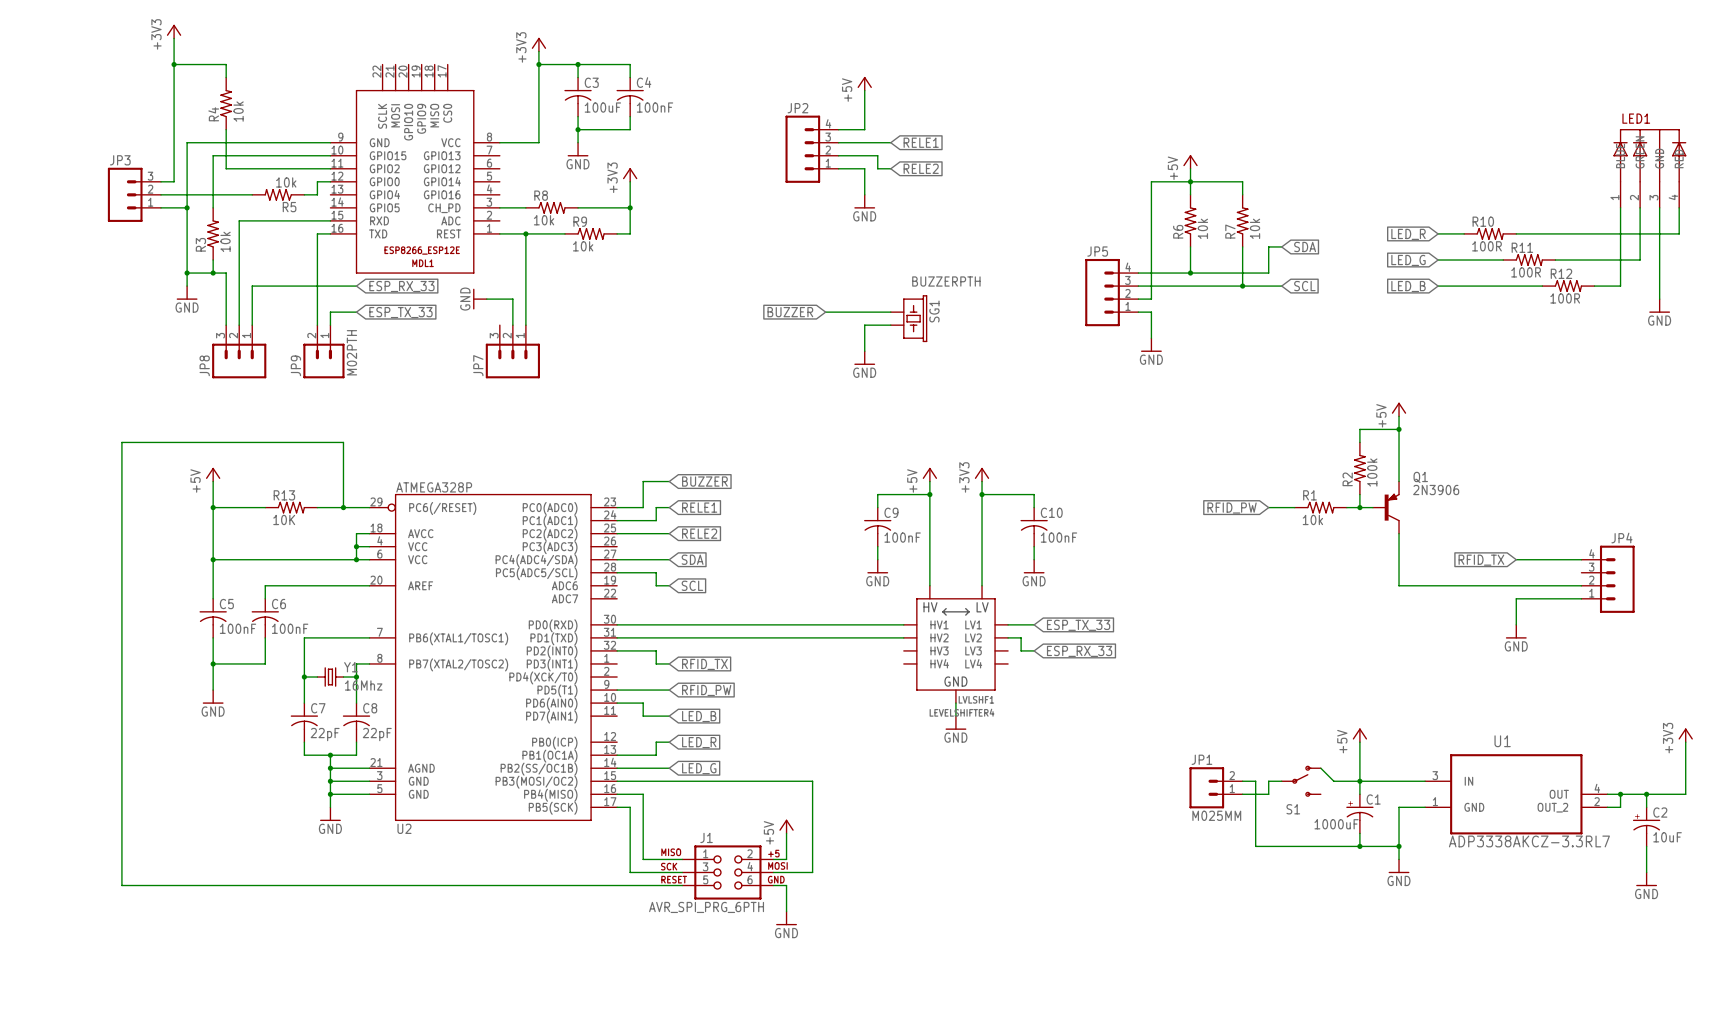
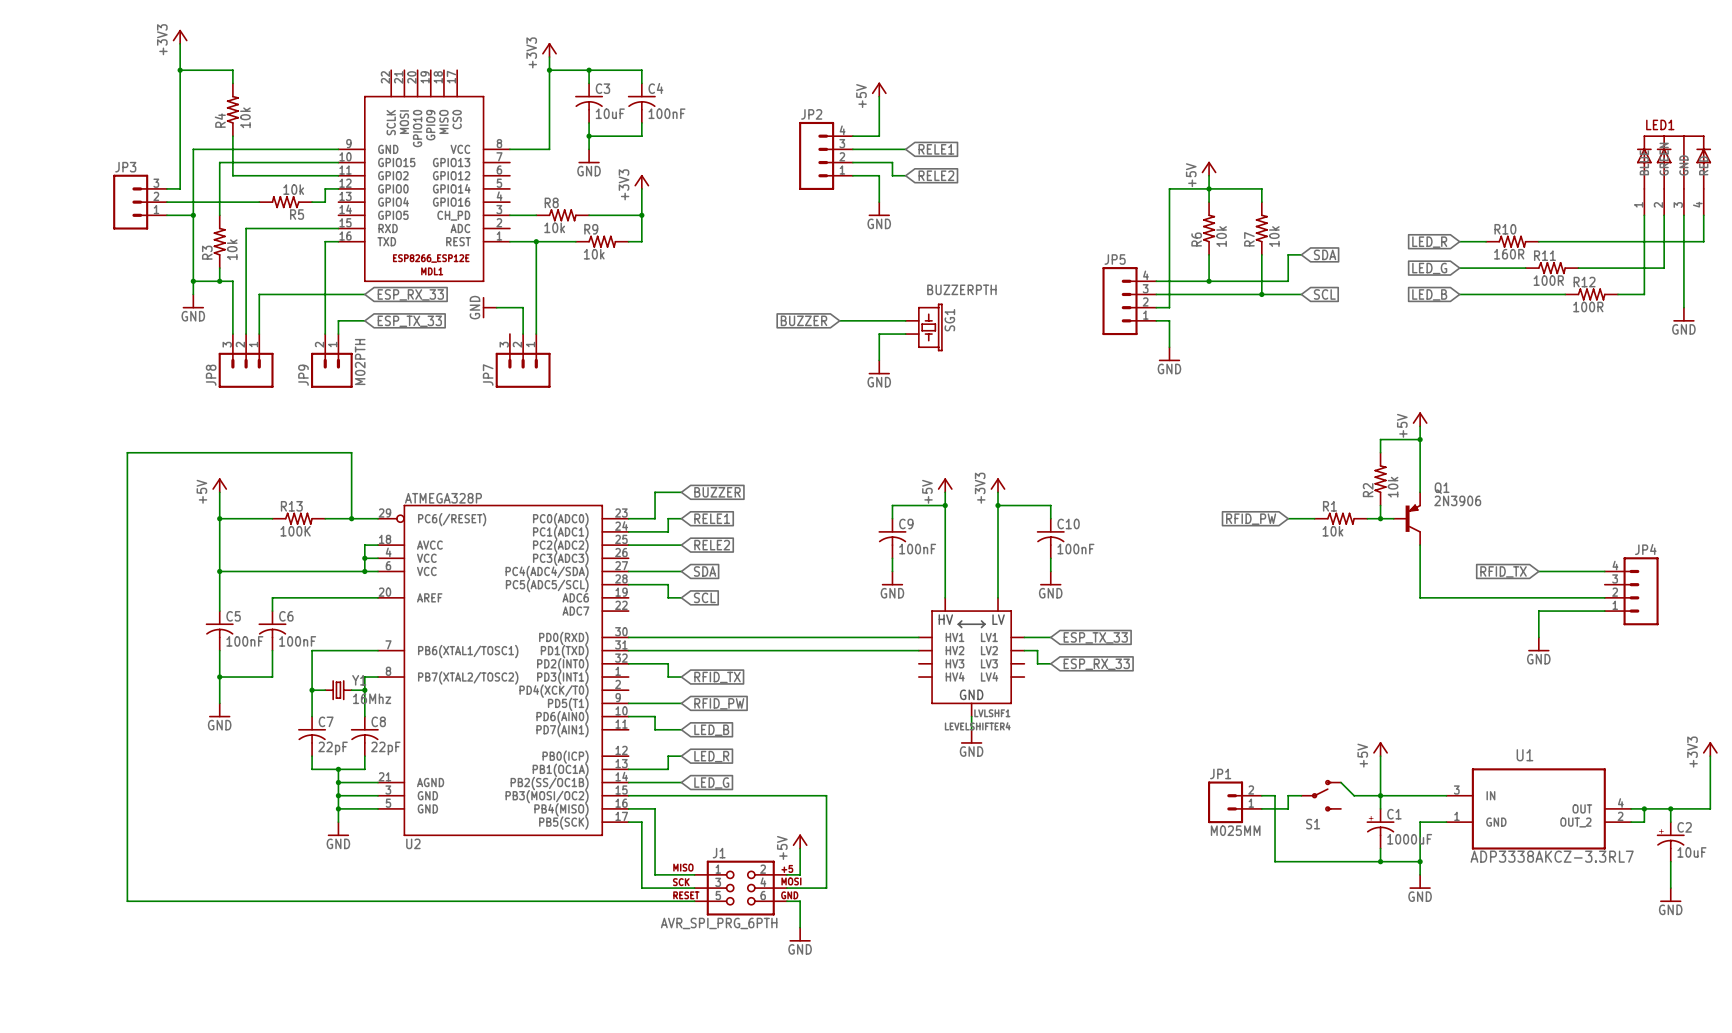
C3 value: 100uF (602, 107) -> 10uF (610, 113)
R10 value: 100R (1487, 246) -> 160R (1509, 254)
R2 value: 100k (1372, 472) -> 10k (1393, 487)
R13 value: 10K (284, 519) -> 100K (295, 531)
C1 value position: 1000uF (1336, 824) -> 1000uF (1409, 839)

